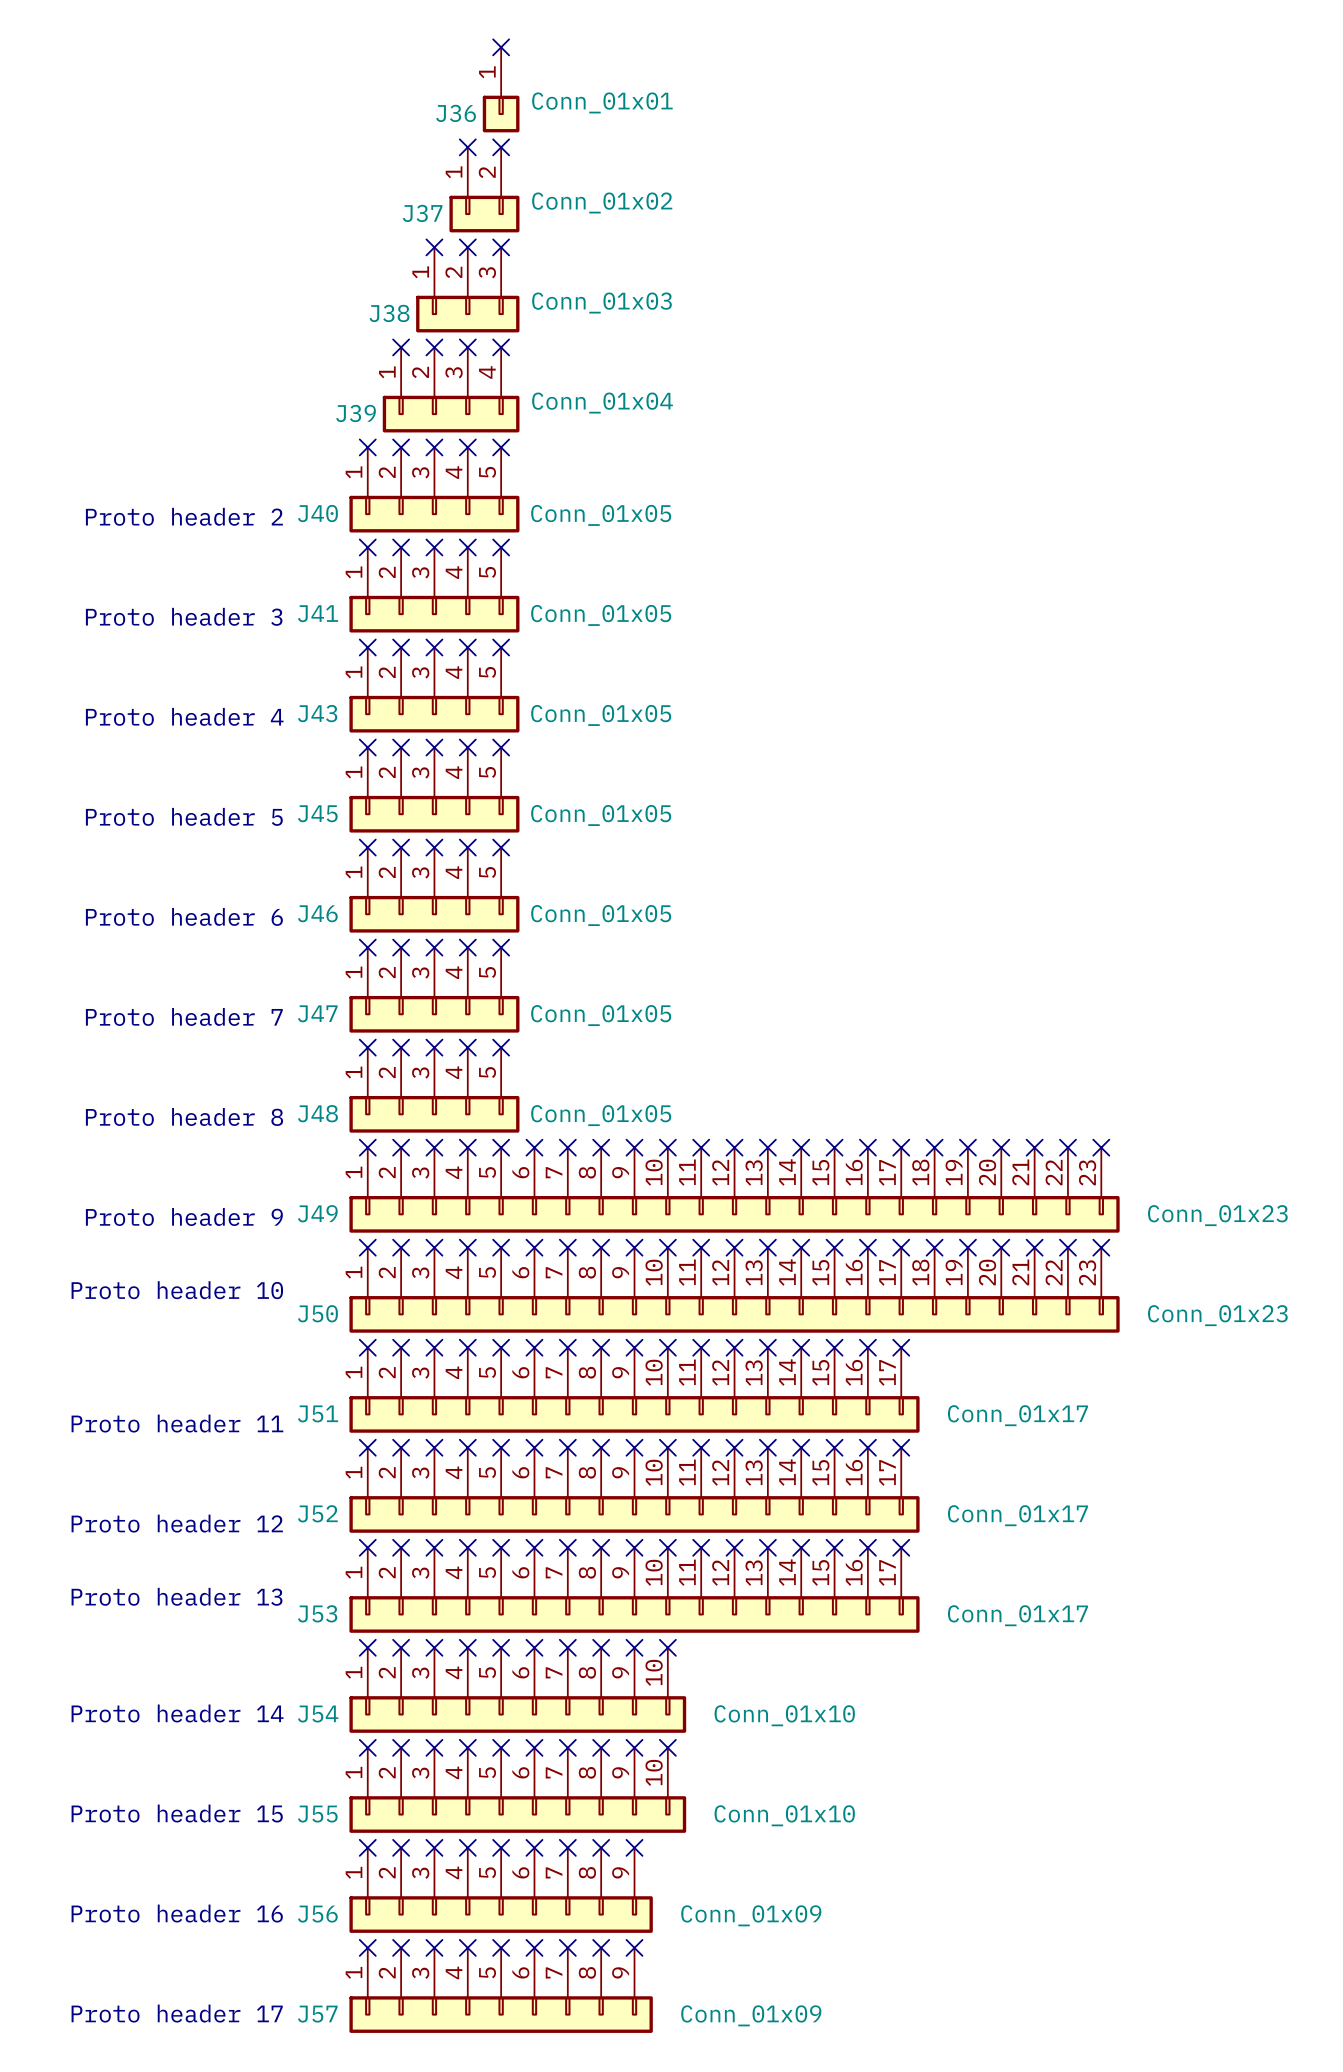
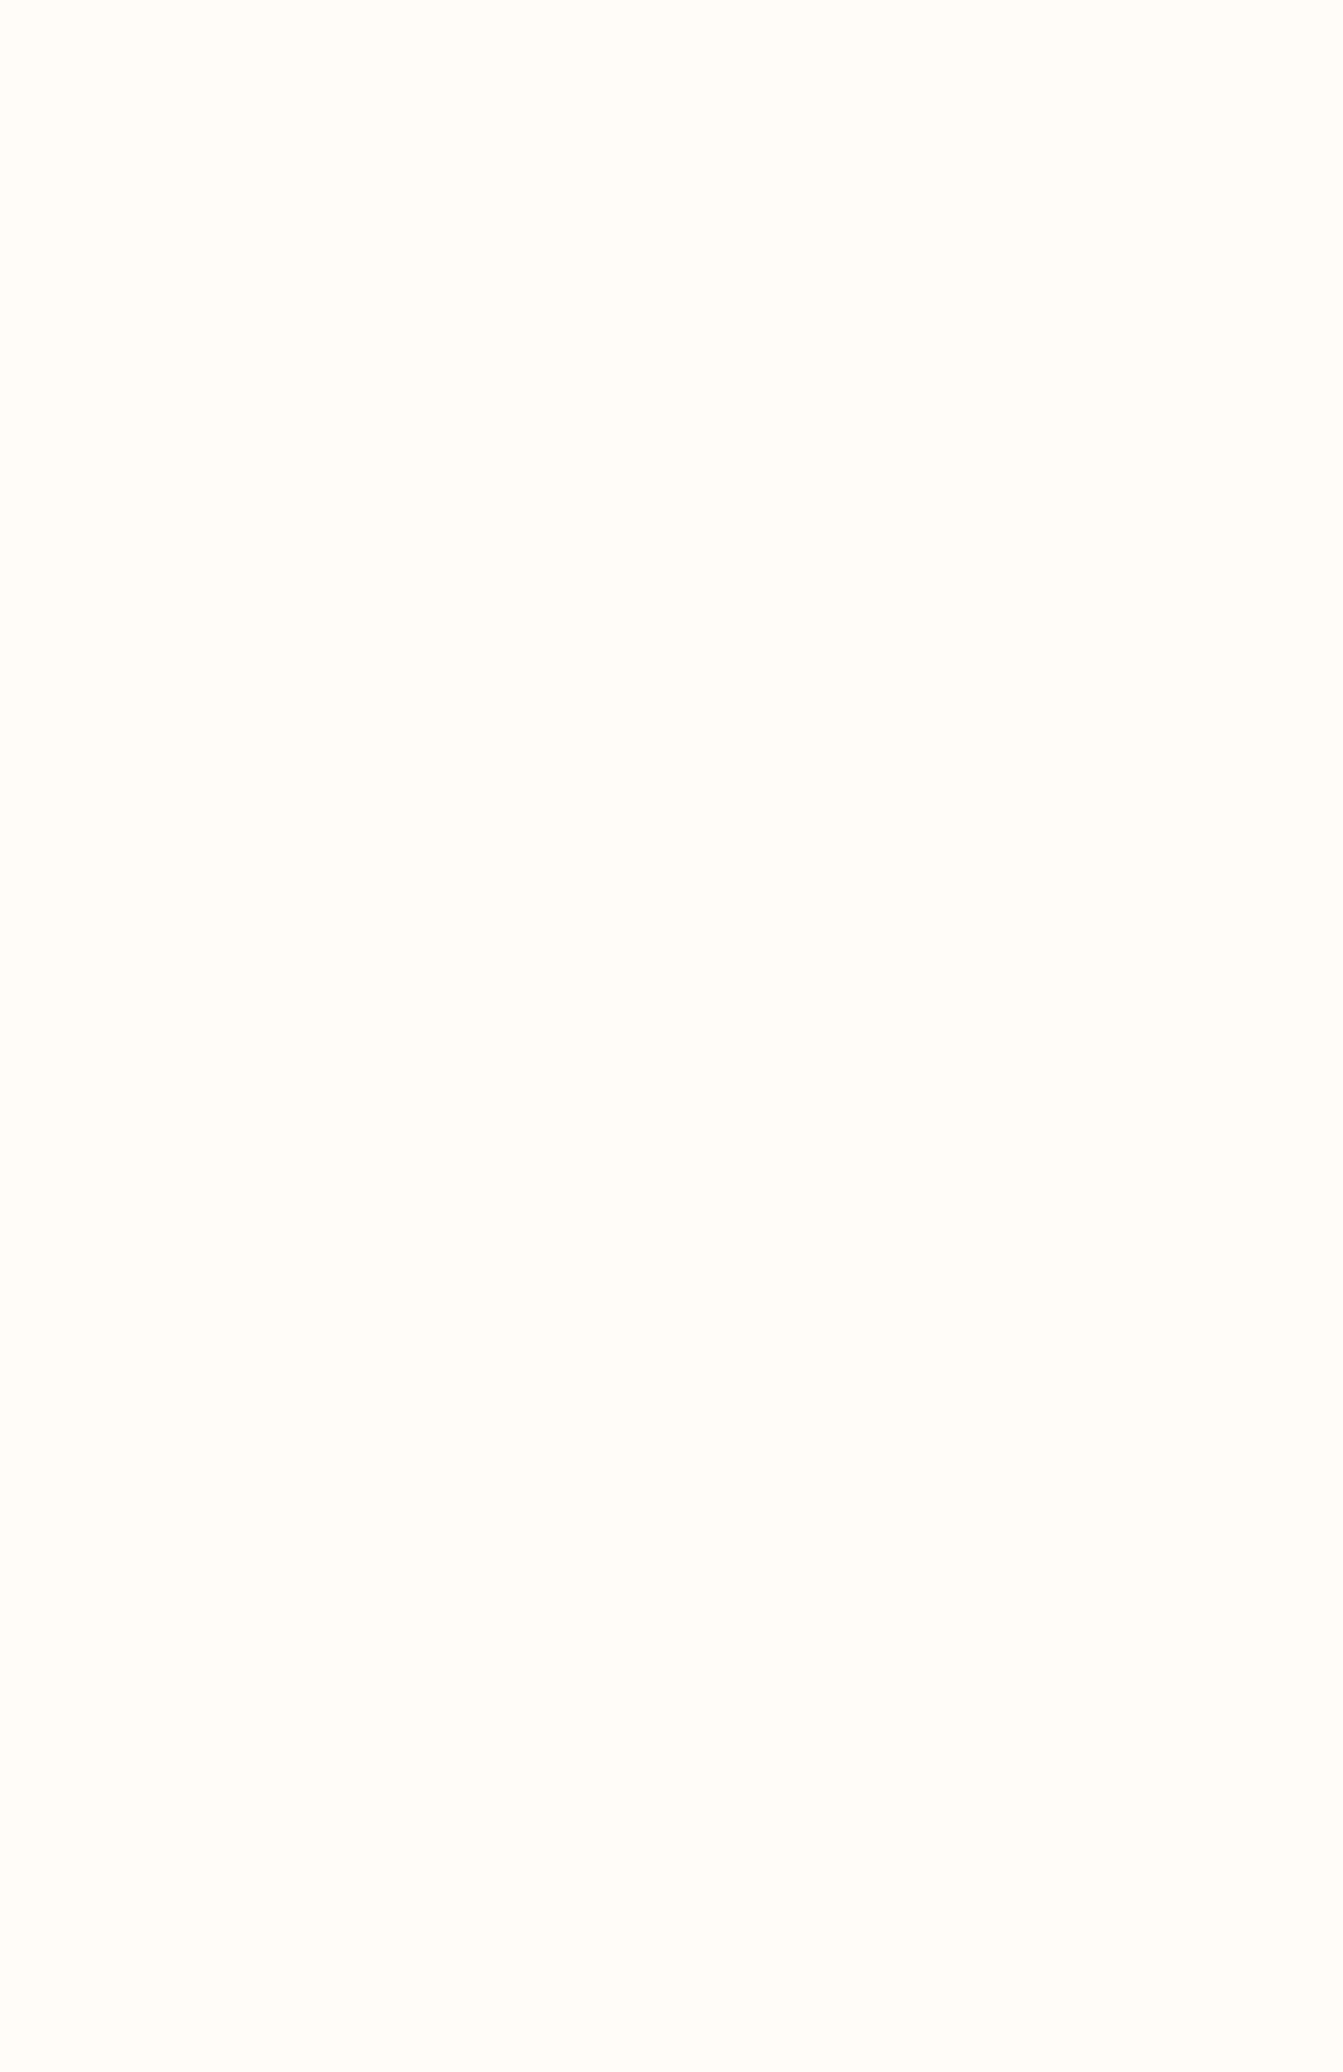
no-connect mark: (501, 47) -> none
J36: Conn_01x01 (501, 89) -> none
no-connect mark: (467, 147) -> none
no-connect mark: (501, 147) -> none
J37: Conn_01x02 (484, 189) -> none
no-connect mark: (434, 247) -> none
no-connect mark: (467, 247) -> none
no-connect mark: (501, 247) -> none
J38: Conn_01x03 (467, 289) -> none
no-connect mark: (401, 347) -> none
no-connect mark: (434, 347) -> none
no-connect mark: (467, 347) -> none
no-connect mark: (501, 347) -> none
J39: Conn_01x04 (451, 389) -> none
no-connect mark: (367, 447) -> none
no-connect mark: (401, 447) -> none
no-connect mark: (434, 447) -> none
no-connect mark: (467, 447) -> none
no-connect mark: (501, 447) -> none
J40: Conn_01x05 (434, 489) -> none
text: Proto header 2 (184, 516) -> none
no-connect mark: (367, 547) -> none
no-connect mark: (401, 547) -> none
no-connect mark: (434, 547) -> none
no-connect mark: (467, 547) -> none
no-connect mark: (501, 547) -> none
J41: Conn_01x05 (434, 590) -> none
text: Proto header 3 (184, 616) -> none
no-connect mark: (367, 647) -> none
no-connect mark: (401, 647) -> none
no-connect mark: (434, 647) -> none
no-connect mark: (467, 647) -> none
no-connect mark: (501, 647) -> none
J43: Conn_01x05 (434, 690) -> none
text: Proto header 4 (184, 716) -> none
no-connect mark: (367, 747) -> none
no-connect mark: (401, 747) -> none
no-connect mark: (434, 747) -> none
no-connect mark: (467, 747) -> none
no-connect mark: (501, 747) -> none
J45: Conn_01x05 (434, 790) -> none
text: Proto header 5 (184, 816) -> none
no-connect mark: (367, 847) -> none
no-connect mark: (401, 847) -> none
no-connect mark: (434, 847) -> none
no-connect mark: (467, 847) -> none
no-connect mark: (501, 847) -> none
J46: Conn_01x05 (434, 890) -> none
text: Proto header 6 (184, 916) -> none
no-connect mark: (367, 947) -> none
no-connect mark: (401, 947) -> none
no-connect mark: (434, 947) -> none
no-connect mark: (467, 947) -> none
no-connect mark: (501, 947) -> none
J47: Conn_01x05 (434, 990) -> none
text: Proto header 7 (184, 1016) -> none
no-connect mark: (367, 1047) -> none
no-connect mark: (401, 1047) -> none
no-connect mark: (434, 1047) -> none
no-connect mark: (467, 1047) -> none
no-connect mark: (501, 1047) -> none
J48: Conn_01x05 (434, 1090) -> none
text: Proto header 8 (184, 1116) -> none
no-connect mark: (367, 1147) -> none
no-connect mark: (401, 1147) -> none
no-connect mark: (434, 1147) -> none
no-connect mark: (467, 1147) -> none
no-connect mark: (501, 1147) -> none
no-connect mark: (534, 1147) -> none
no-connect mark: (567, 1147) -> none
no-connect mark: (601, 1147) -> none
no-connect mark: (634, 1147) -> none
no-connect mark: (667, 1147) -> none
no-connect mark: (701, 1147) -> none
no-connect mark: (734, 1147) -> none
no-connect mark: (767, 1147) -> none
no-connect mark: (801, 1147) -> none
no-connect mark: (834, 1147) -> none
no-connect mark: (867, 1147) -> none
no-connect mark: (901, 1147) -> none
no-connect mark: (934, 1147) -> none
no-connect mark: (967, 1147) -> none
no-connect mark: (1001, 1147) -> none
no-connect mark: (1034, 1147) -> none
no-connect mark: (1067, 1147) -> none
no-connect mark: (1101, 1147) -> none
J49: Conn_01x23 (734, 1190) -> none
text: Proto header 9 (184, 1217) -> none
no-connect mark: (367, 1247) -> none
no-connect mark: (401, 1247) -> none
no-connect mark: (434, 1247) -> none
no-connect mark: (467, 1247) -> none
no-connect mark: (501, 1247) -> none
no-connect mark: (534, 1247) -> none
no-connect mark: (567, 1247) -> none
no-connect mark: (601, 1247) -> none
no-connect mark: (634, 1247) -> none
no-connect mark: (667, 1247) -> none
no-connect mark: (701, 1247) -> none
no-connect mark: (734, 1247) -> none
no-connect mark: (767, 1247) -> none
no-connect mark: (801, 1247) -> none
no-connect mark: (834, 1247) -> none
no-connect mark: (867, 1247) -> none
no-connect mark: (901, 1247) -> none
no-connect mark: (934, 1247) -> none
no-connect mark: (967, 1247) -> none
no-connect mark: (1001, 1247) -> none
no-connect mark: (1034, 1247) -> none
no-connect mark: (1067, 1247) -> none
no-connect mark: (1101, 1247) -> none
text: Proto header 10 (177, 1290) -> none
J50: Conn_01x23 (734, 1290) -> none
no-connect mark: (367, 1347) -> none
no-connect mark: (401, 1347) -> none
no-connect mark: (434, 1347) -> none
no-connect mark: (467, 1347) -> none
no-connect mark: (501, 1347) -> none
no-connect mark: (534, 1347) -> none
no-connect mark: (567, 1347) -> none
no-connect mark: (601, 1347) -> none
no-connect mark: (634, 1347) -> none
no-connect mark: (667, 1347) -> none
no-connect mark: (701, 1347) -> none
no-connect mark: (734, 1347) -> none
no-connect mark: (767, 1347) -> none
no-connect mark: (801, 1347) -> none
no-connect mark: (834, 1347) -> none
no-connect mark: (867, 1347) -> none
no-connect mark: (901, 1347) -> none
J51: Conn_01x17 (634, 1390) -> none
text: Proto header 11 (177, 1423) -> none
no-connect mark: (367, 1447) -> none
no-connect mark: (401, 1447) -> none
no-connect mark: (434, 1447) -> none
no-connect mark: (467, 1447) -> none
no-connect mark: (501, 1447) -> none
no-connect mark: (534, 1447) -> none
no-connect mark: (567, 1447) -> none
no-connect mark: (601, 1447) -> none
no-connect mark: (634, 1447) -> none
no-connect mark: (667, 1447) -> none
no-connect mark: (701, 1447) -> none
no-connect mark: (734, 1447) -> none
no-connect mark: (767, 1447) -> none
no-connect mark: (801, 1447) -> none
no-connect mark: (834, 1447) -> none
no-connect mark: (867, 1447) -> none
no-connect mark: (901, 1447) -> none
J52: Conn_01x17 (634, 1490) -> none
text: Proto header 12 (177, 1523) -> none
no-connect mark: (367, 1547) -> none
no-connect mark: (401, 1547) -> none
no-connect mark: (434, 1547) -> none
no-connect mark: (467, 1547) -> none
no-connect mark: (501, 1547) -> none
no-connect mark: (534, 1547) -> none
no-connect mark: (567, 1547) -> none
no-connect mark: (601, 1547) -> none
no-connect mark: (634, 1547) -> none
no-connect mark: (667, 1547) -> none
no-connect mark: (701, 1547) -> none
no-connect mark: (734, 1547) -> none
no-connect mark: (767, 1547) -> none
no-connect mark: (801, 1547) -> none
no-connect mark: (834, 1547) -> none
no-connect mark: (867, 1547) -> none
no-connect mark: (901, 1547) -> none
J53: Conn_01x17 (634, 1590) -> none
text: Proto header 13 (177, 1596) -> none
no-connect mark: (367, 1647) -> none
no-connect mark: (401, 1647) -> none
no-connect mark: (434, 1647) -> none
no-connect mark: (467, 1647) -> none
no-connect mark: (501, 1647) -> none
no-connect mark: (534, 1647) -> none
no-connect mark: (567, 1647) -> none
no-connect mark: (601, 1647) -> none
no-connect mark: (634, 1647) -> none
no-connect mark: (667, 1647) -> none
J54: Conn_01x10 (517, 1690) -> none
text: Proto header 14 (177, 1713) -> none
no-connect mark: (367, 1747) -> none
no-connect mark: (401, 1747) -> none
no-connect mark: (434, 1747) -> none
no-connect mark: (467, 1747) -> none
no-connect mark: (501, 1747) -> none
no-connect mark: (534, 1747) -> none
no-connect mark: (567, 1747) -> none
no-connect mark: (601, 1747) -> none
no-connect mark: (634, 1747) -> none
no-connect mark: (667, 1747) -> none
J55: Conn_01x10 (517, 1790) -> none
text: Proto header 15 (177, 1813) -> none
no-connect mark: (367, 1847) -> none
no-connect mark: (401, 1847) -> none
no-connect mark: (434, 1847) -> none
no-connect mark: (467, 1847) -> none
no-connect mark: (501, 1847) -> none
no-connect mark: (534, 1847) -> none
no-connect mark: (567, 1847) -> none
no-connect mark: (601, 1847) -> none
no-connect mark: (634, 1847) -> none
J56: Conn_01x09 (501, 1890) -> none
text: Proto header 16 (177, 1913) -> none
no-connect mark: (367, 1947) -> none
no-connect mark: (401, 1947) -> none
no-connect mark: (434, 1947) -> none
no-connect mark: (467, 1947) -> none
no-connect mark: (501, 1947) -> none
no-connect mark: (534, 1947) -> none
no-connect mark: (567, 1947) -> none
no-connect mark: (601, 1947) -> none
no-connect mark: (634, 1947) -> none
J57: Conn_01x09 (501, 1990) -> none
text: Proto header 17 (177, 2013) -> none

